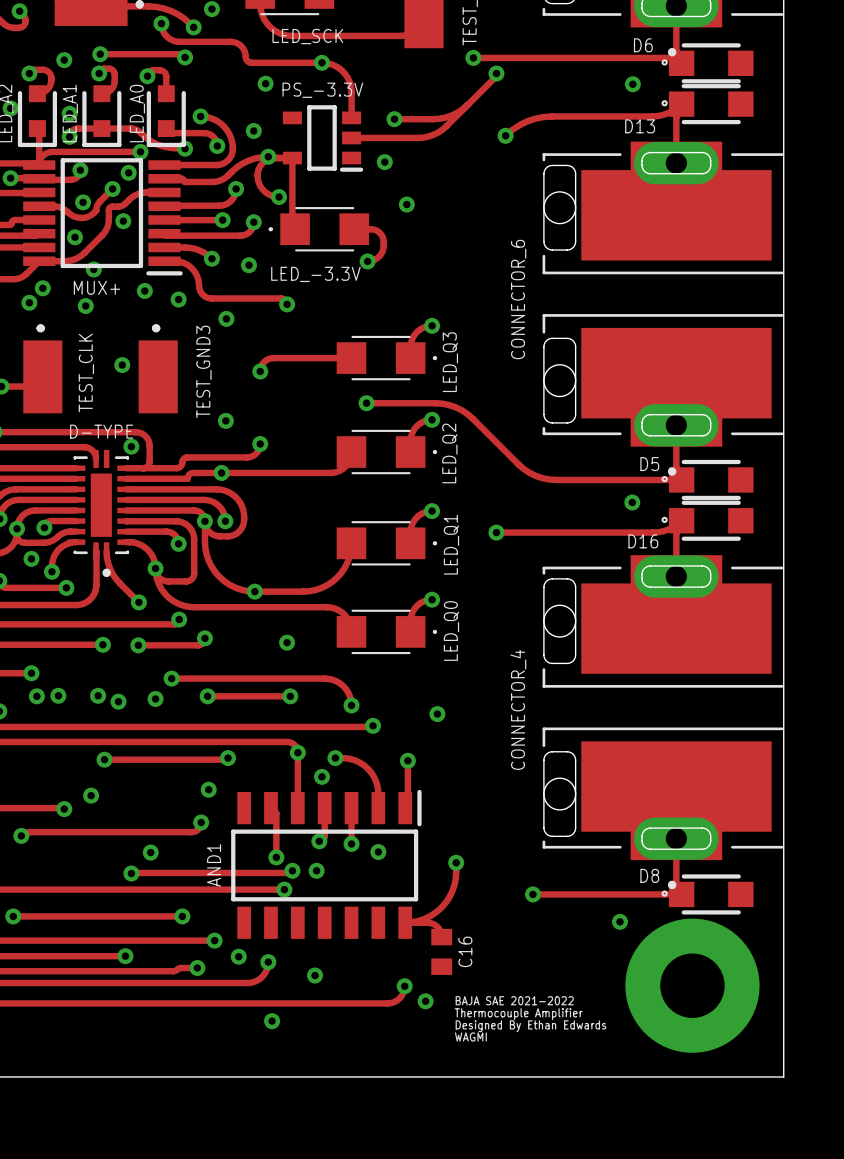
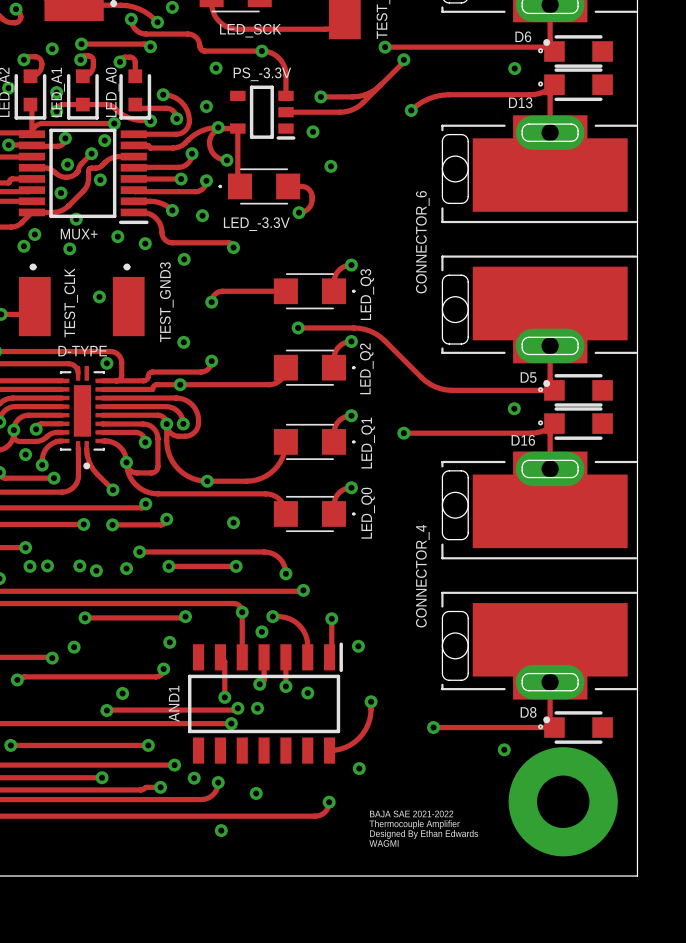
via position: (437, 714) -> (358, 646)
track: (405, 922) (432, 923) (439, 929) (441, 937) -> none
C16: (441, 951) -> none
via position: (425, 1001) -> (359, 768)

